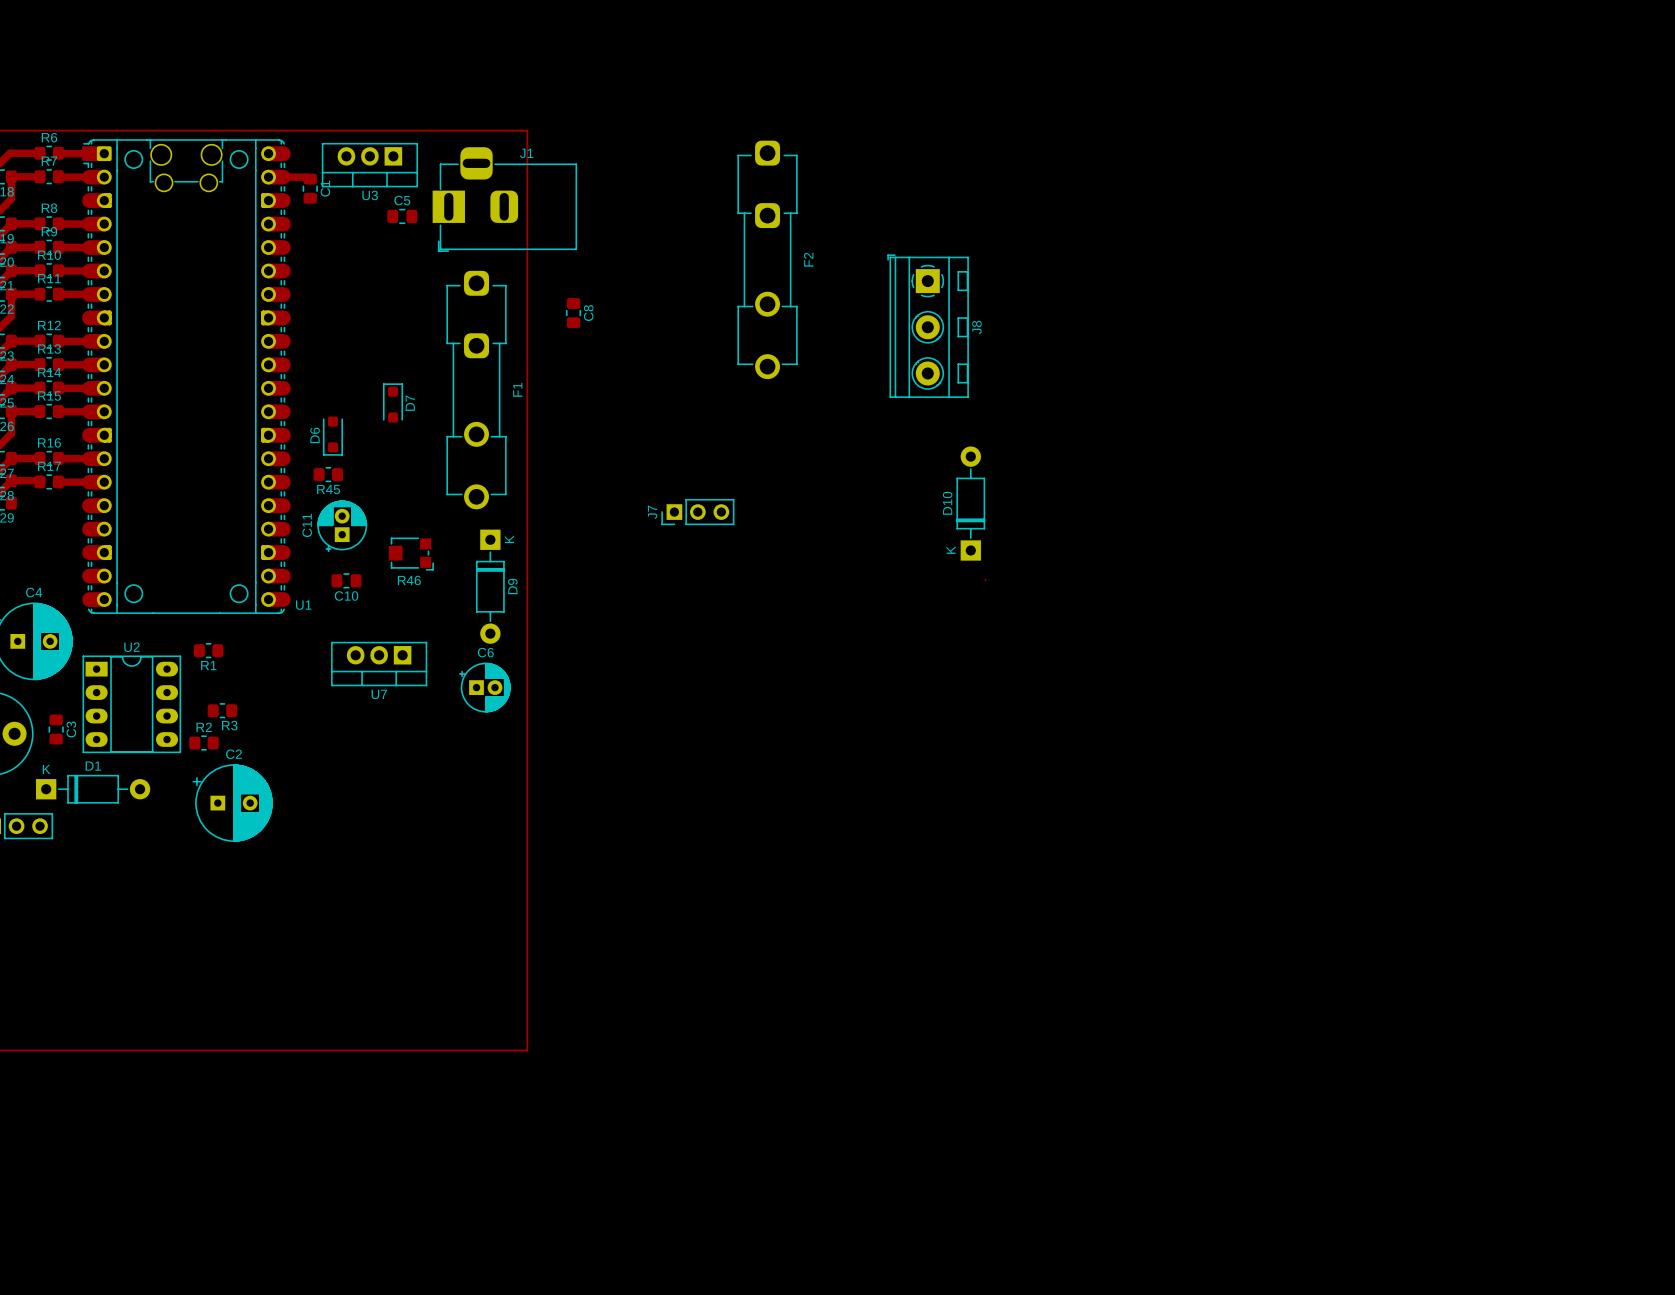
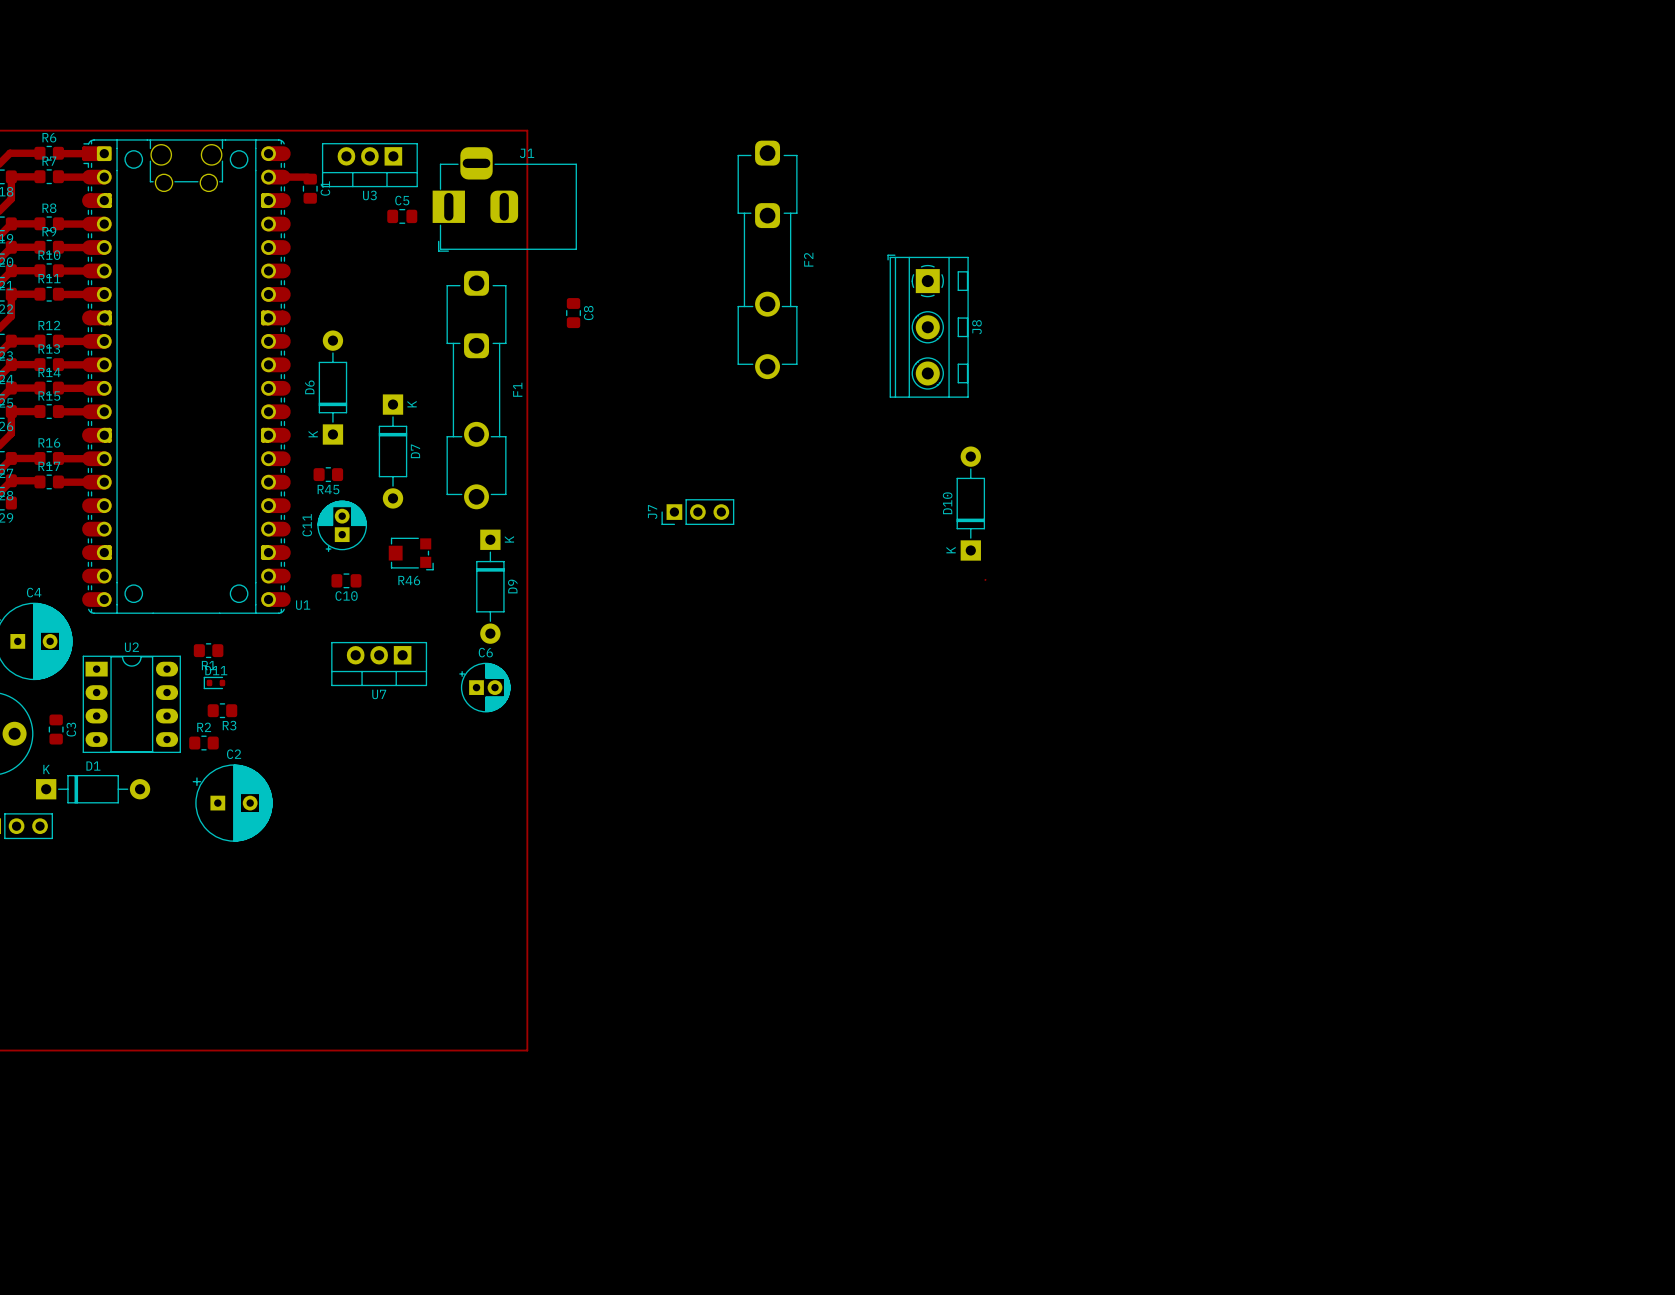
D7 footprint: [383, 383, 403, 423] -> [378, 394, 408, 509]
D6 footprint: [323, 416, 343, 456] -> [318, 330, 348, 445]
D11: none -> (214, 682)

